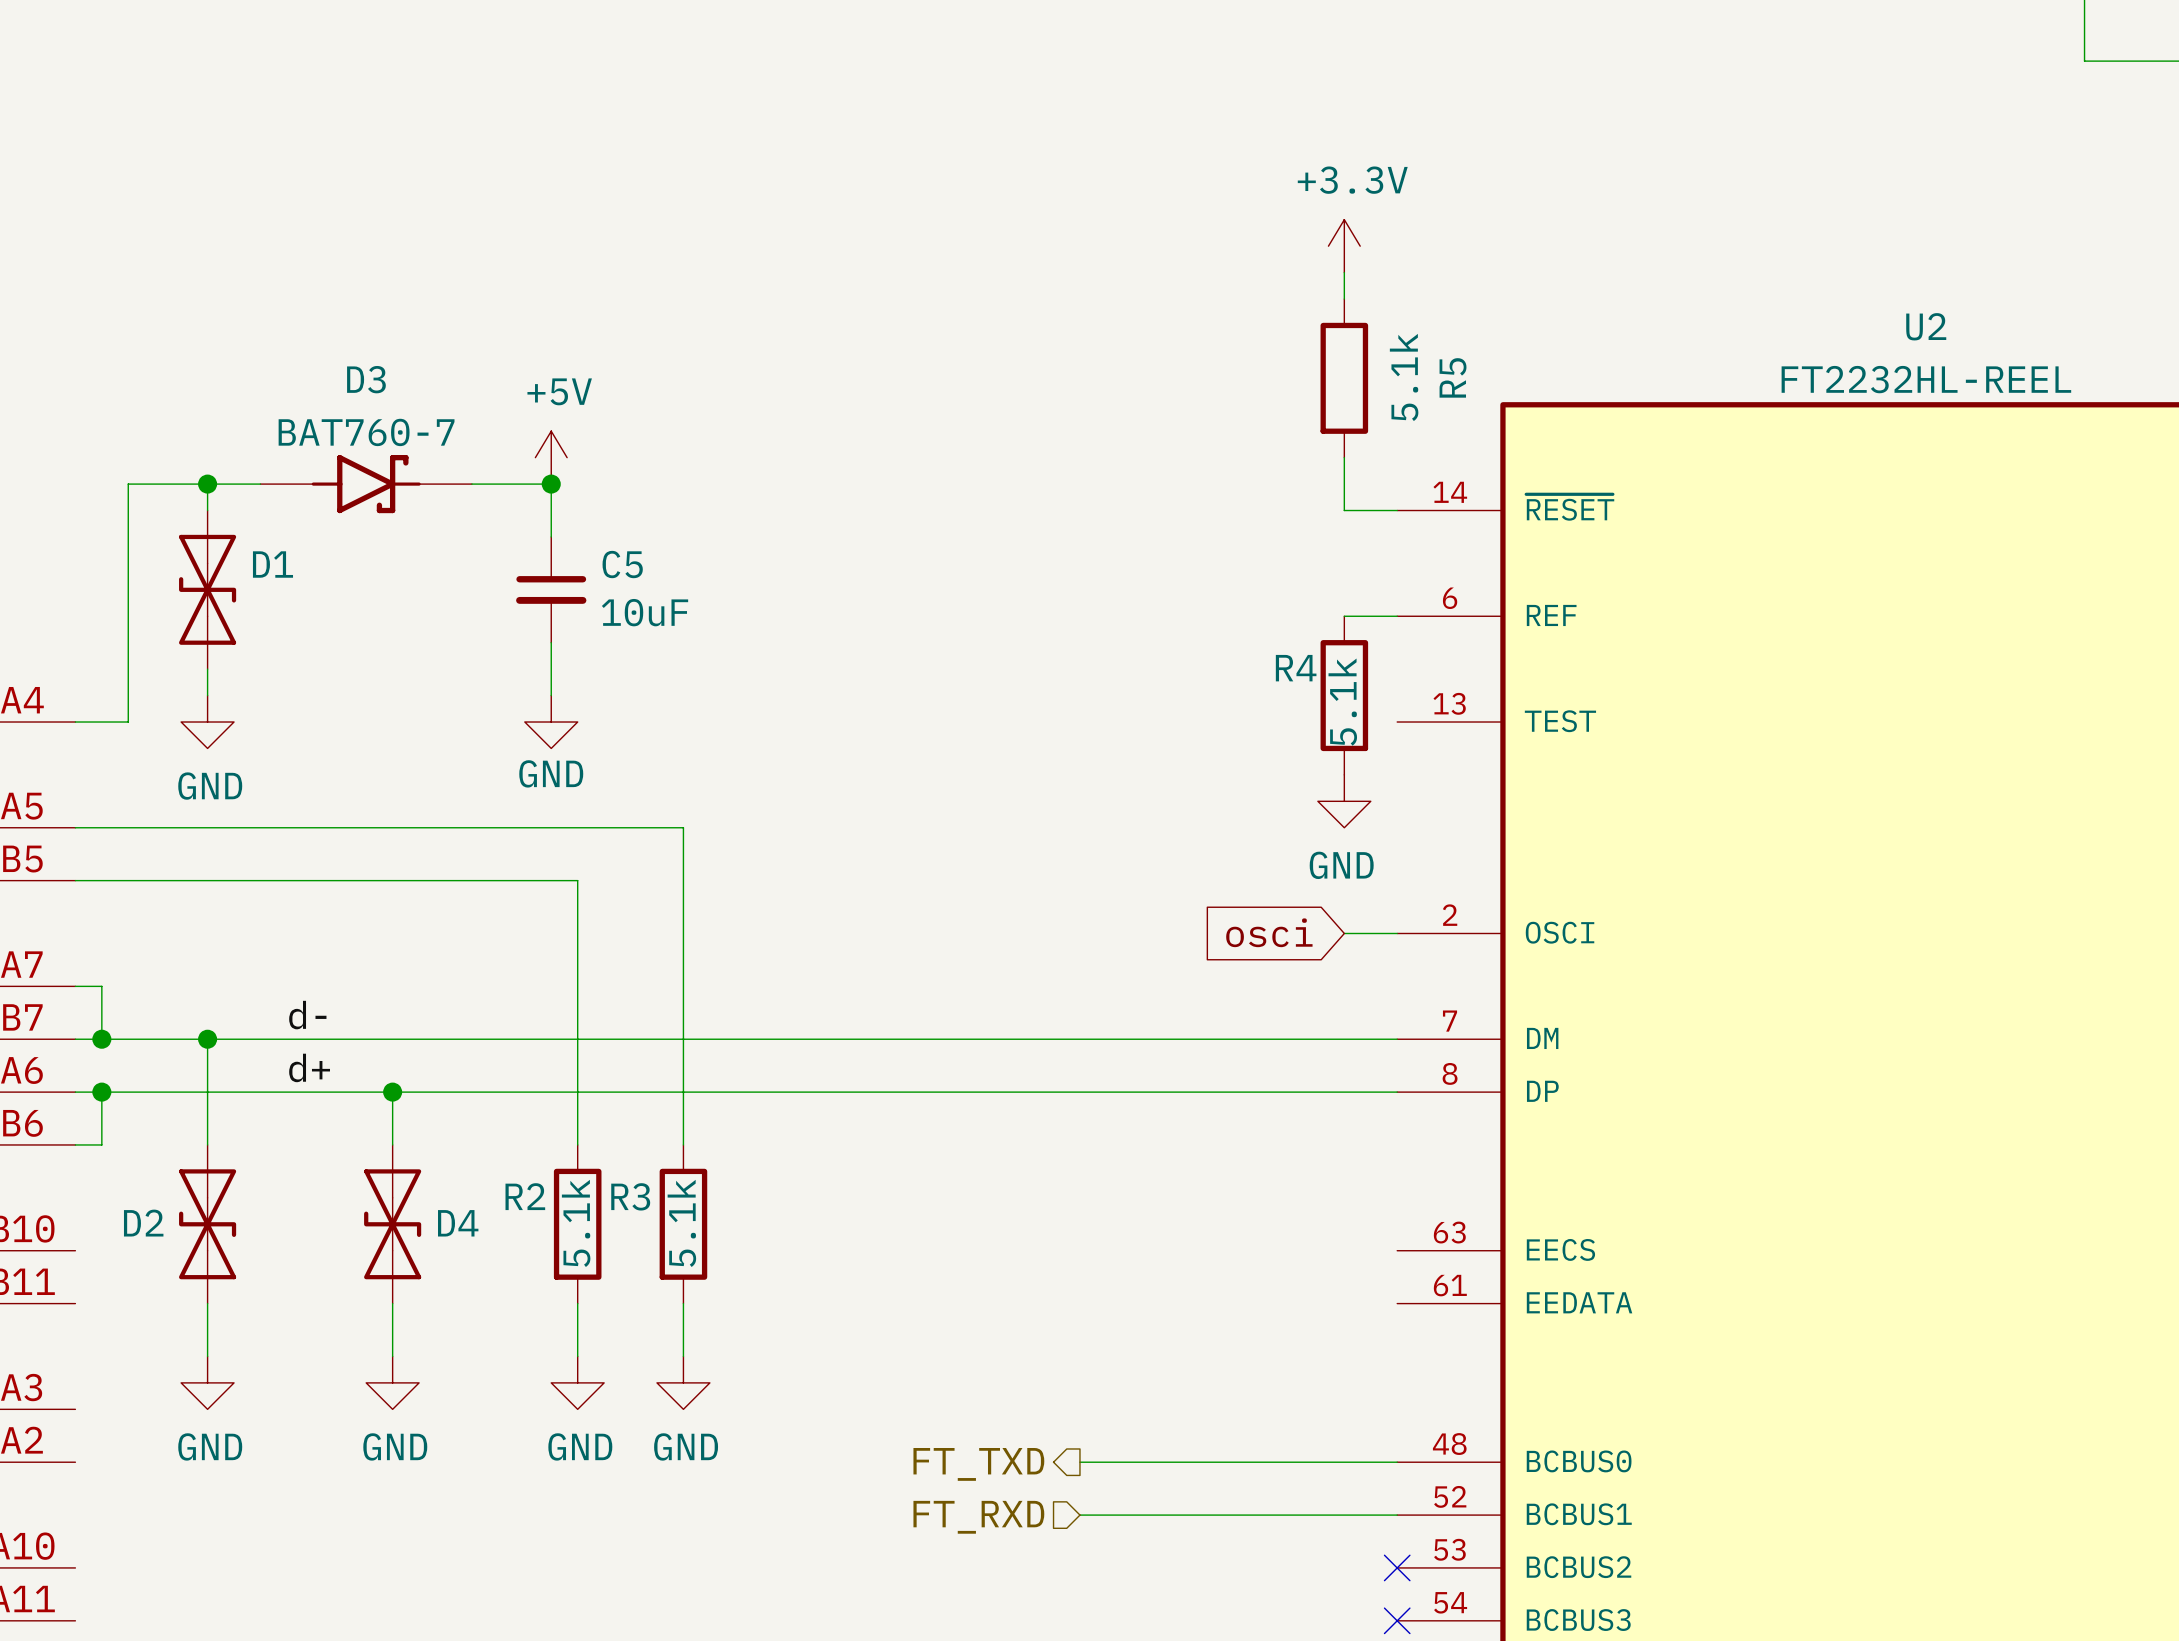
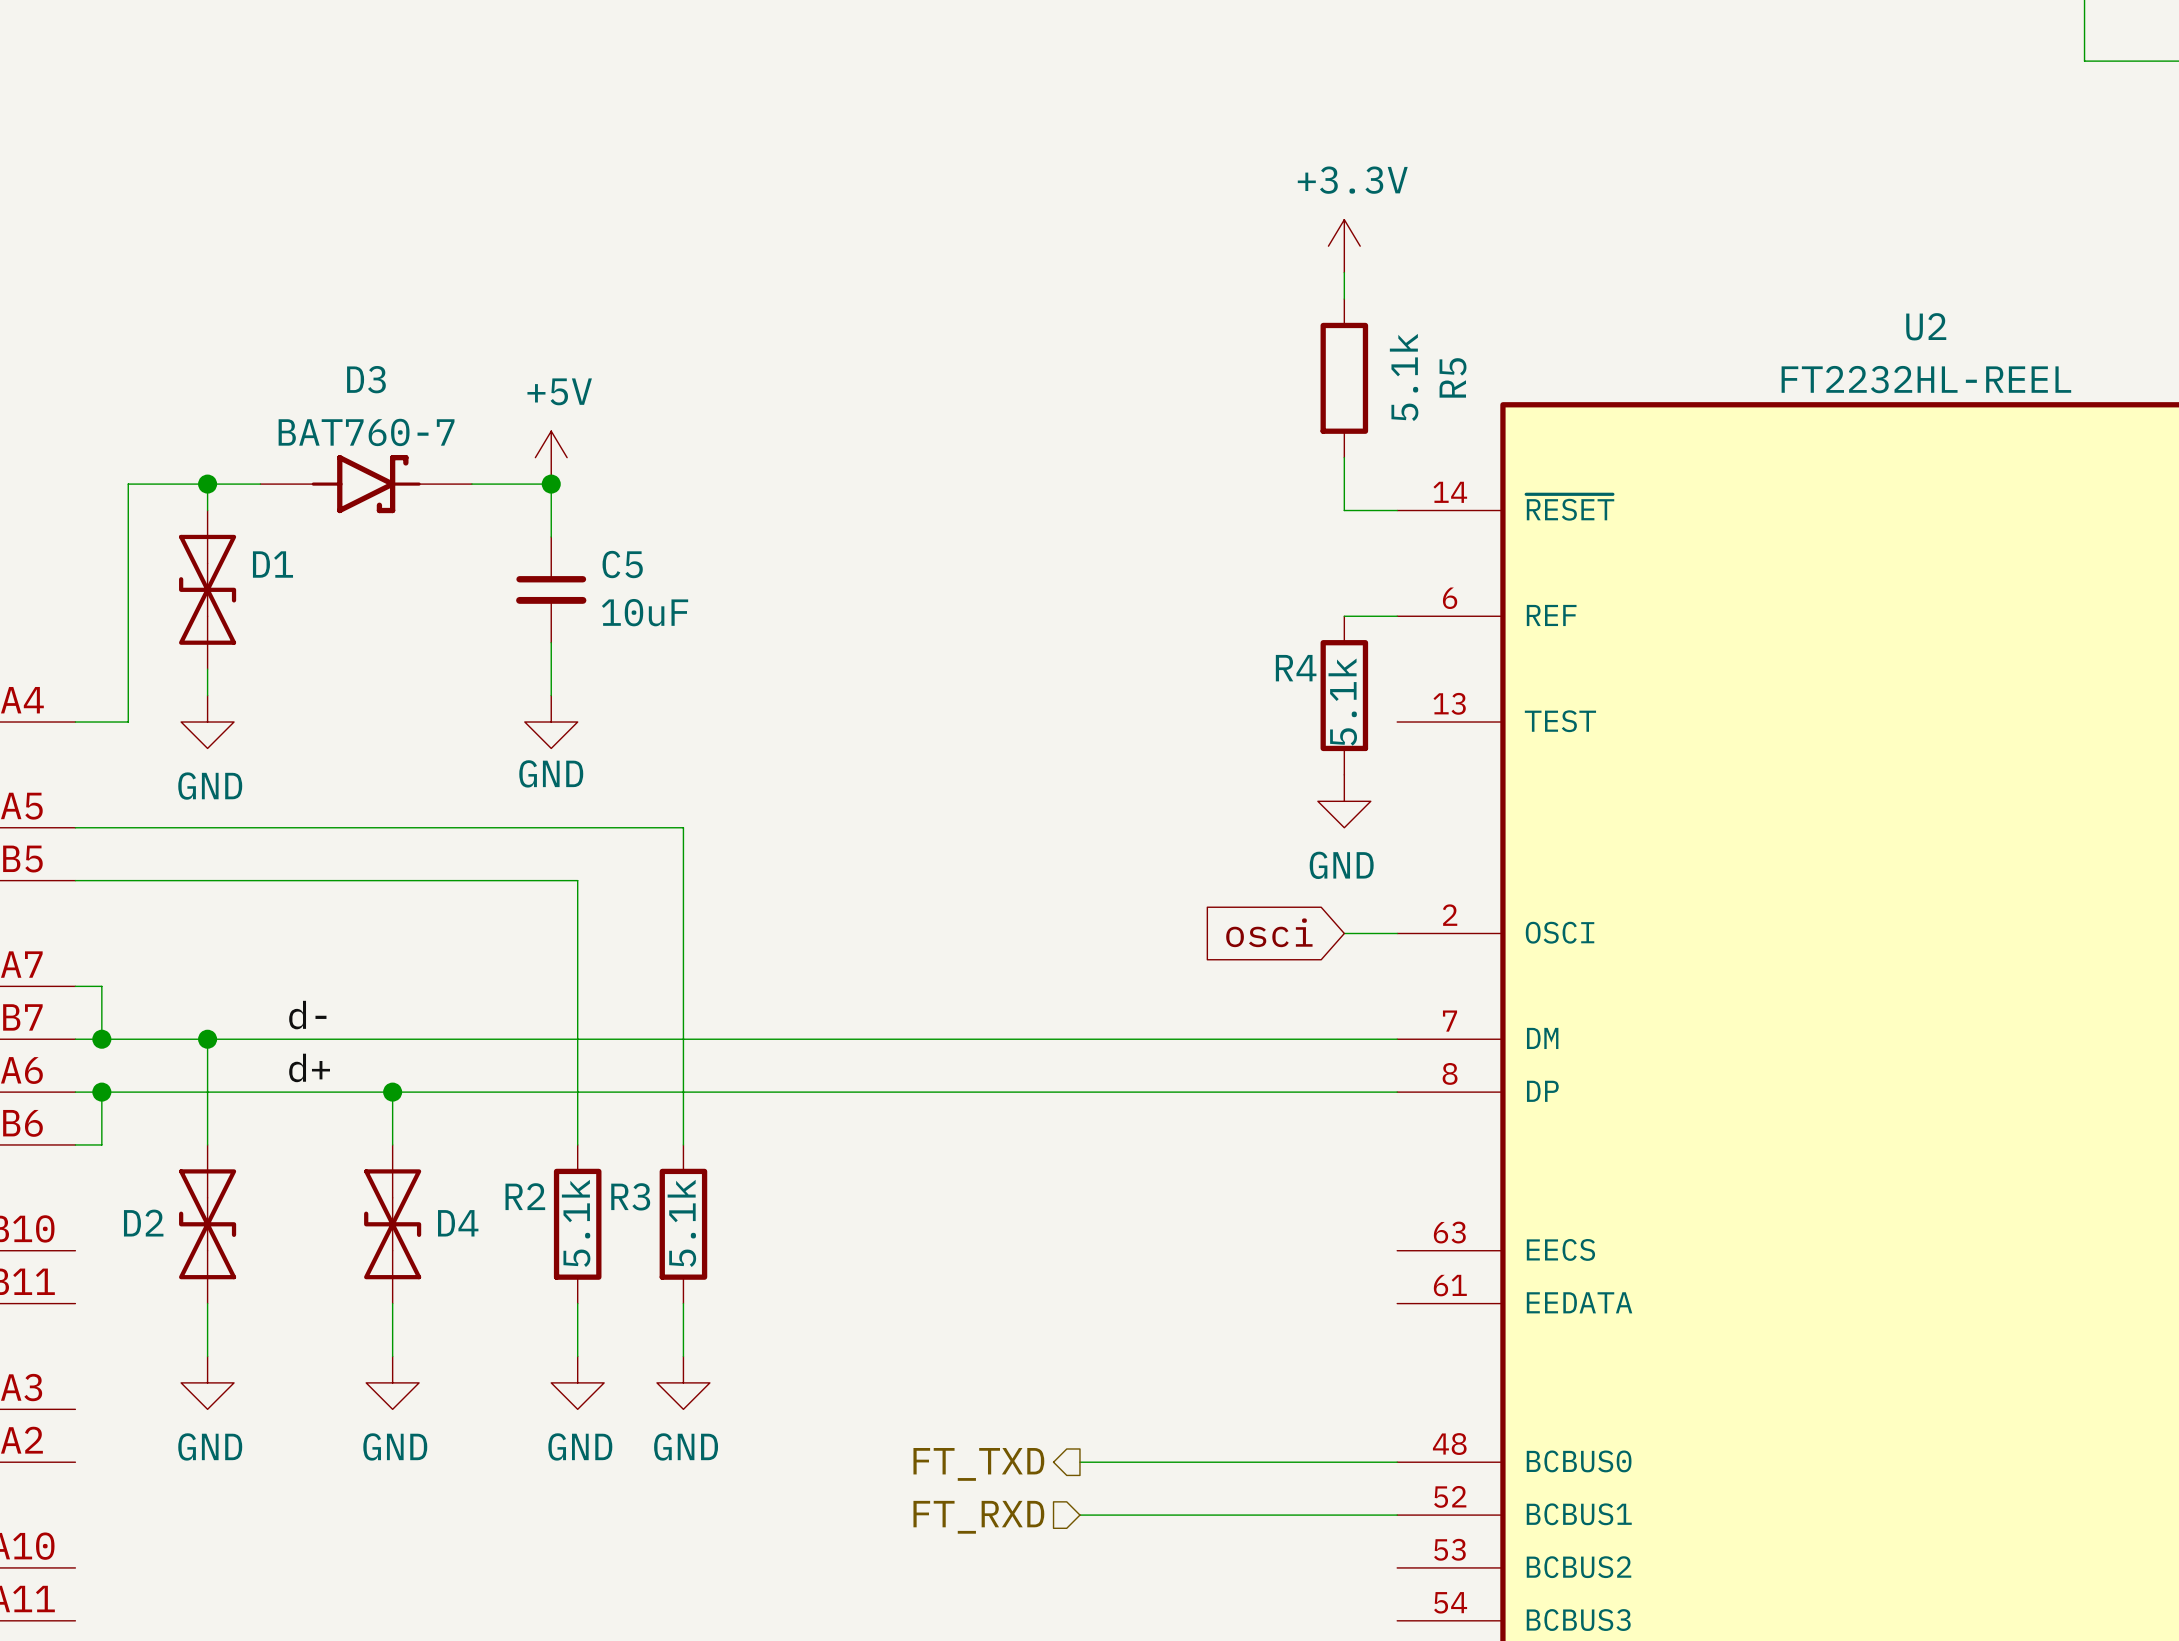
no-connect mark: (1397, 1567) -> none
no-connect mark: (1397, 1620) -> none

